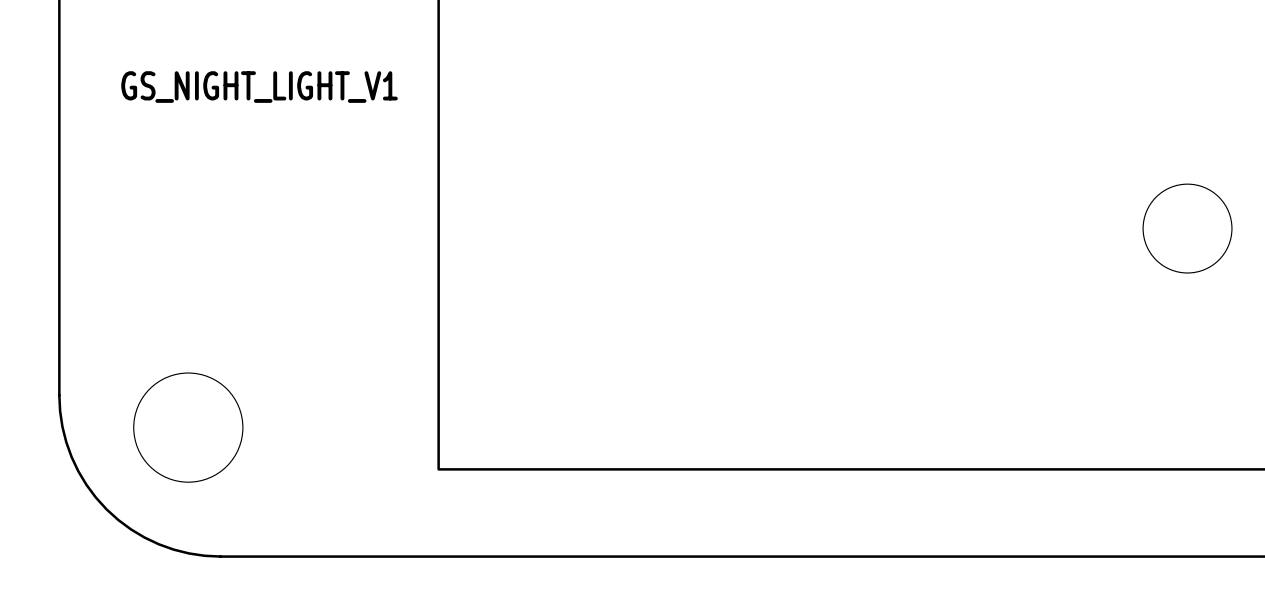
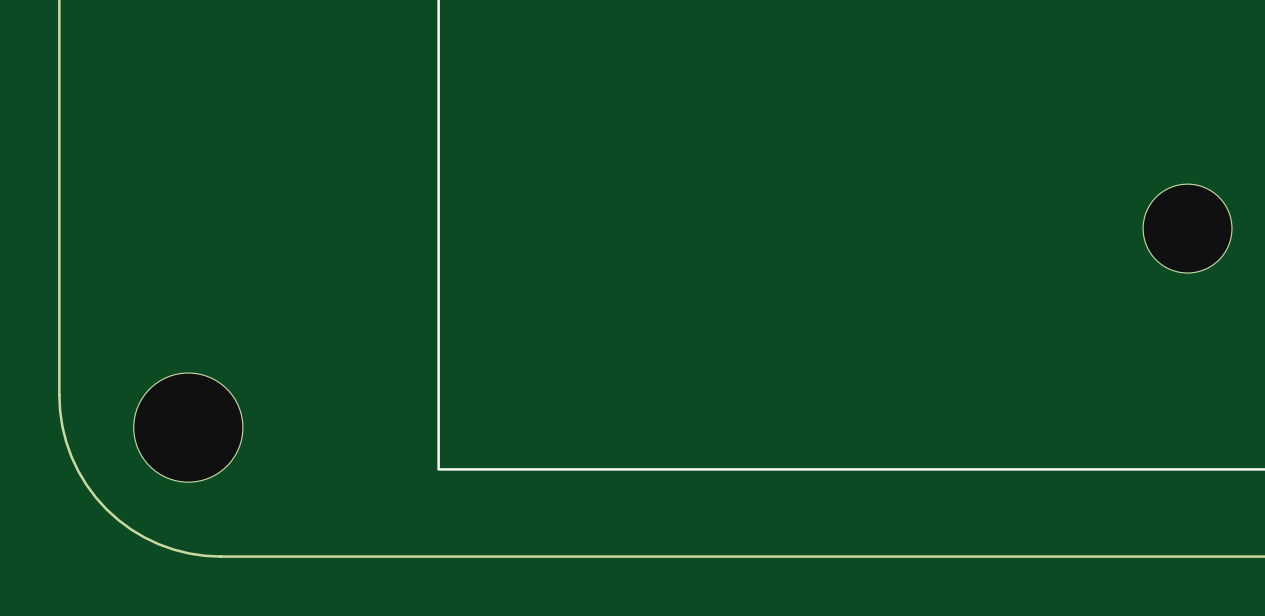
text: GS_NIGHT_LIGHT_V1 (259, 87) -> none

